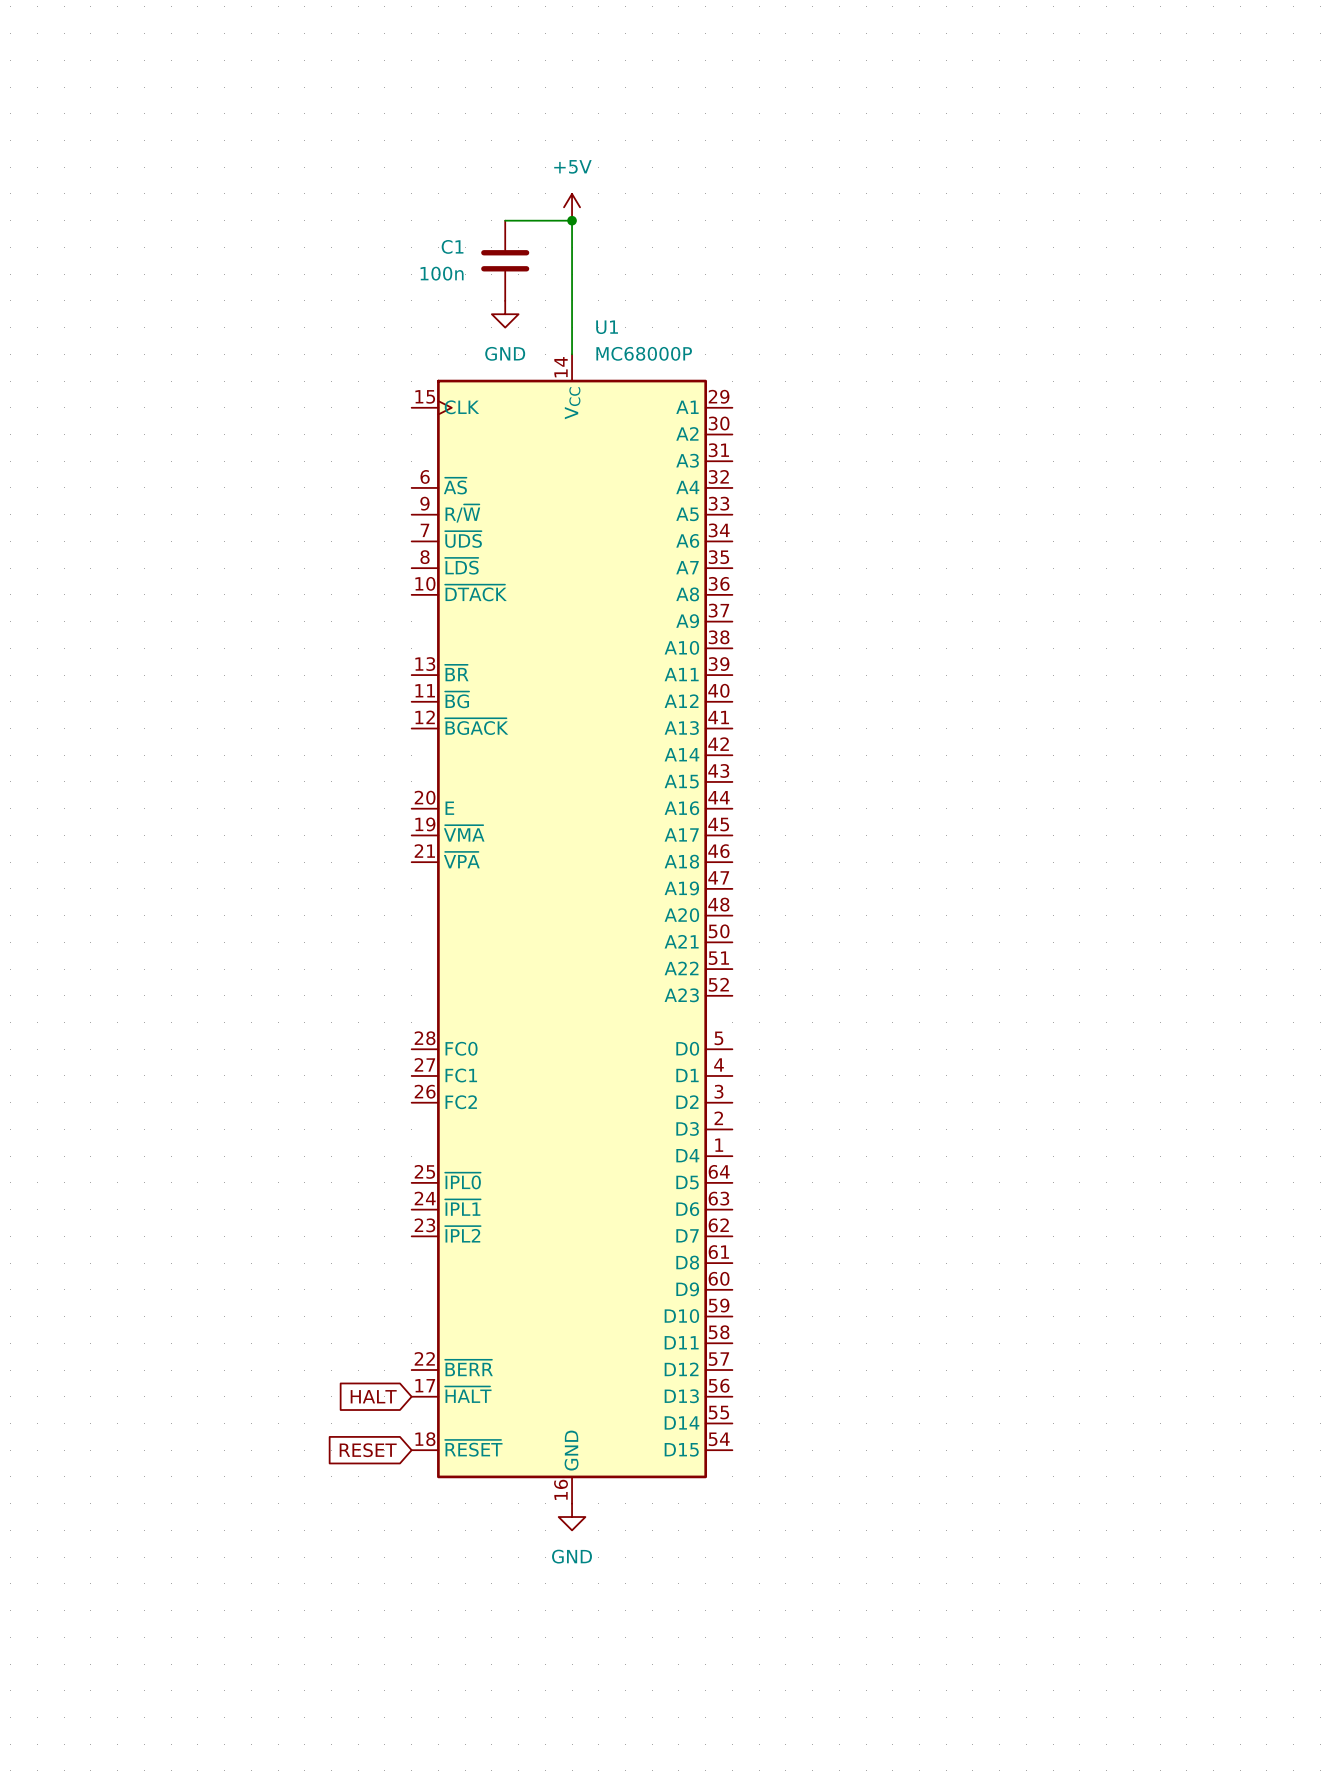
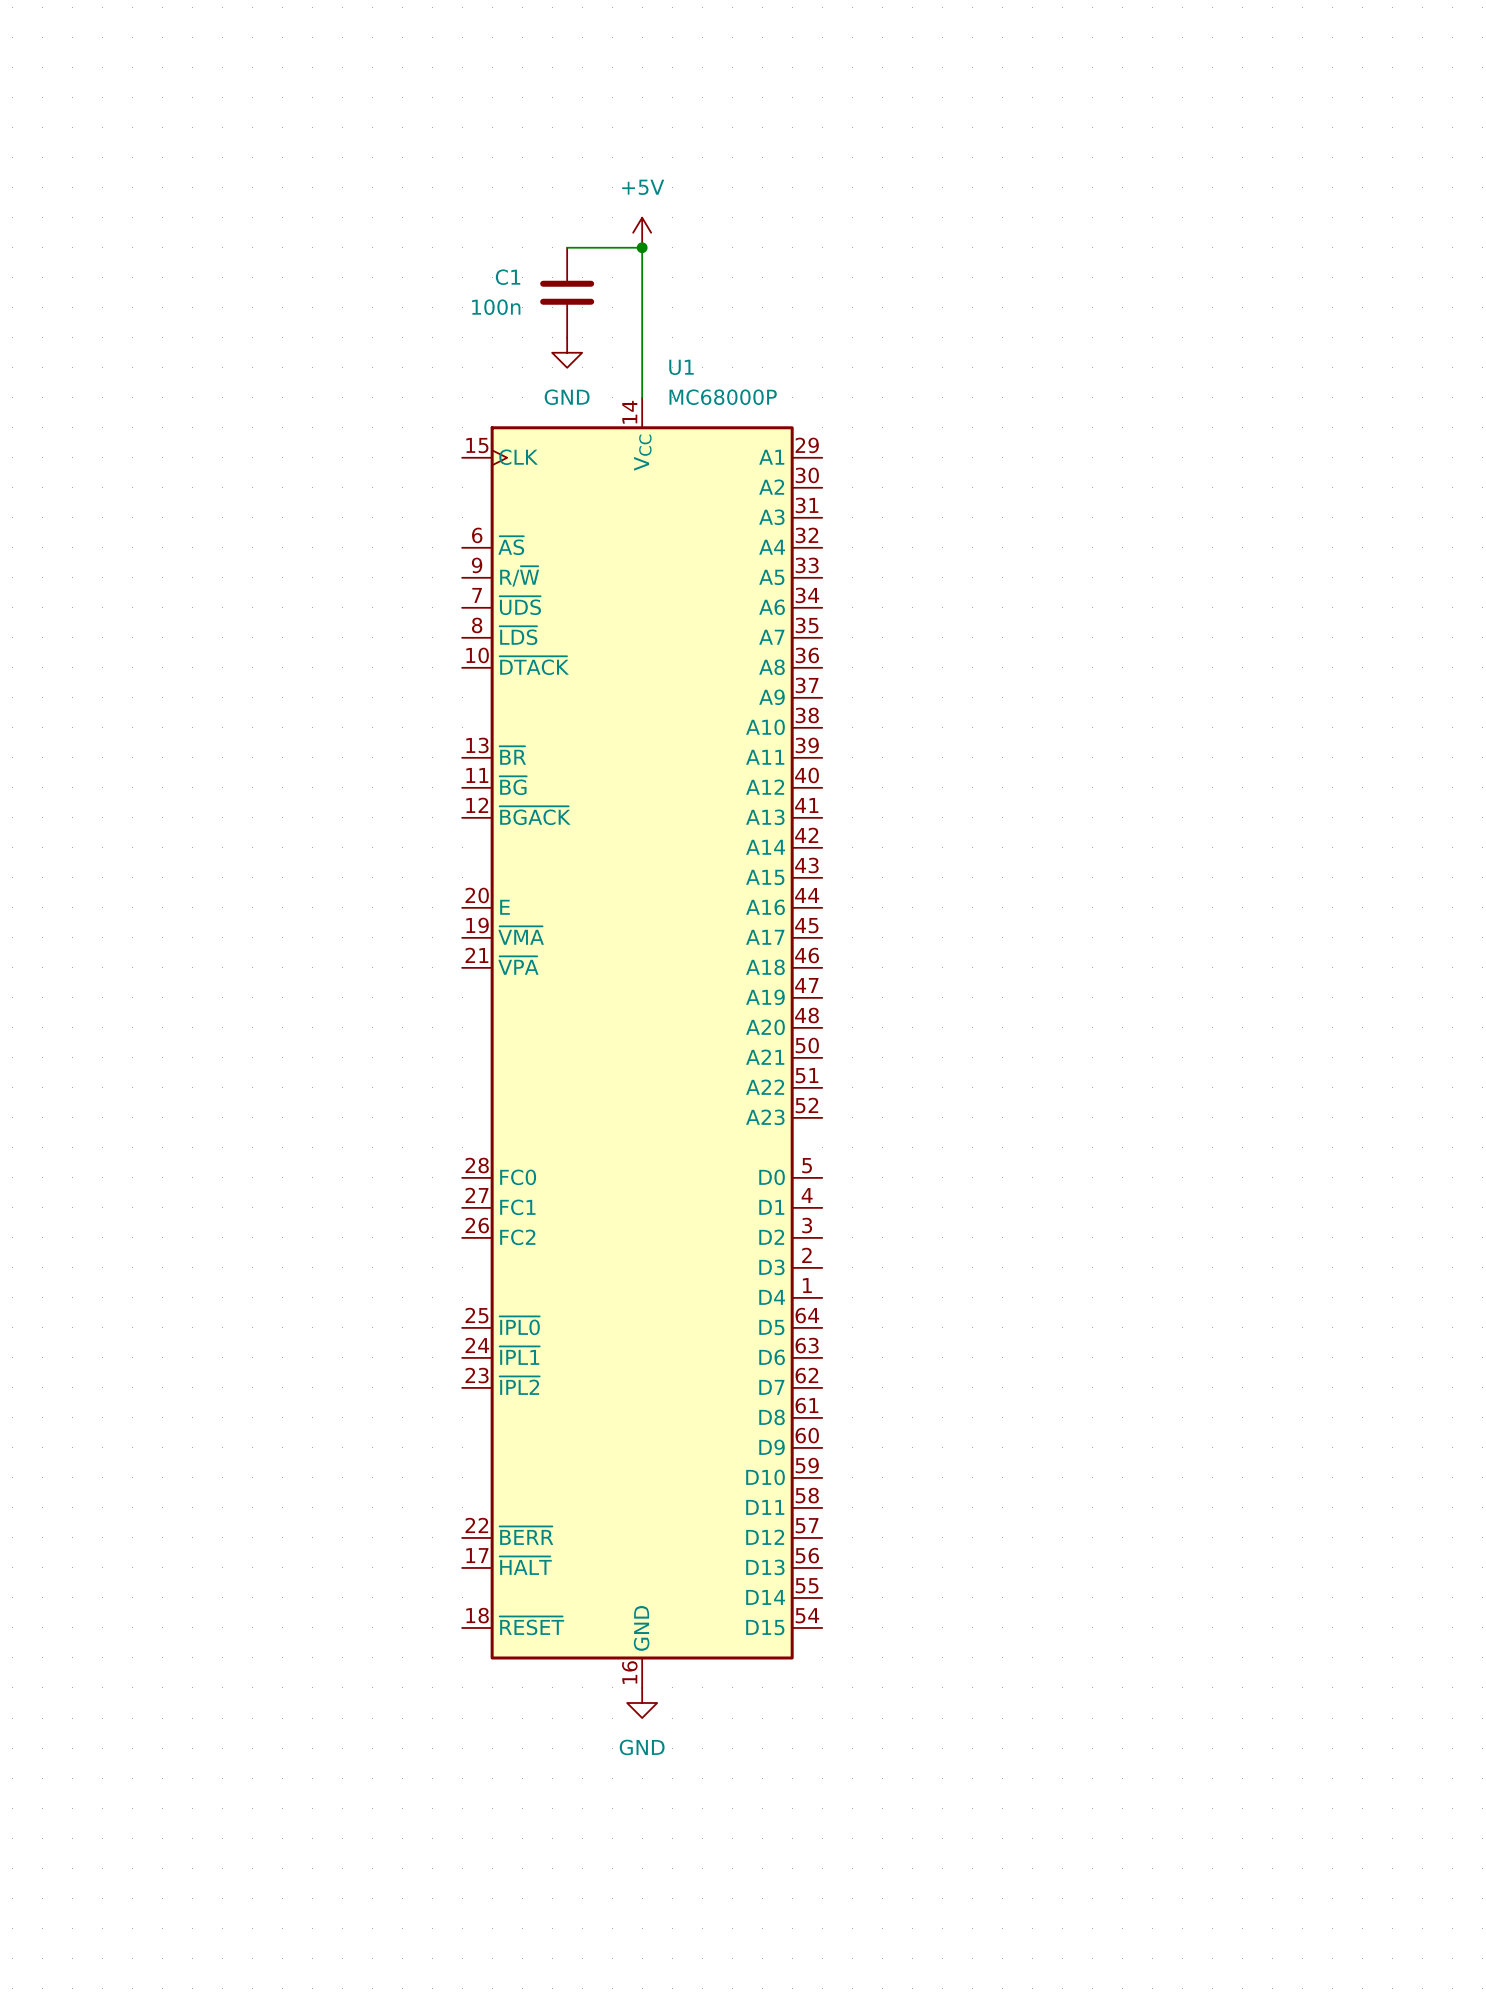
global label: HALT (373, 1396) -> none
global label: RESET (368, 1450) -> none

